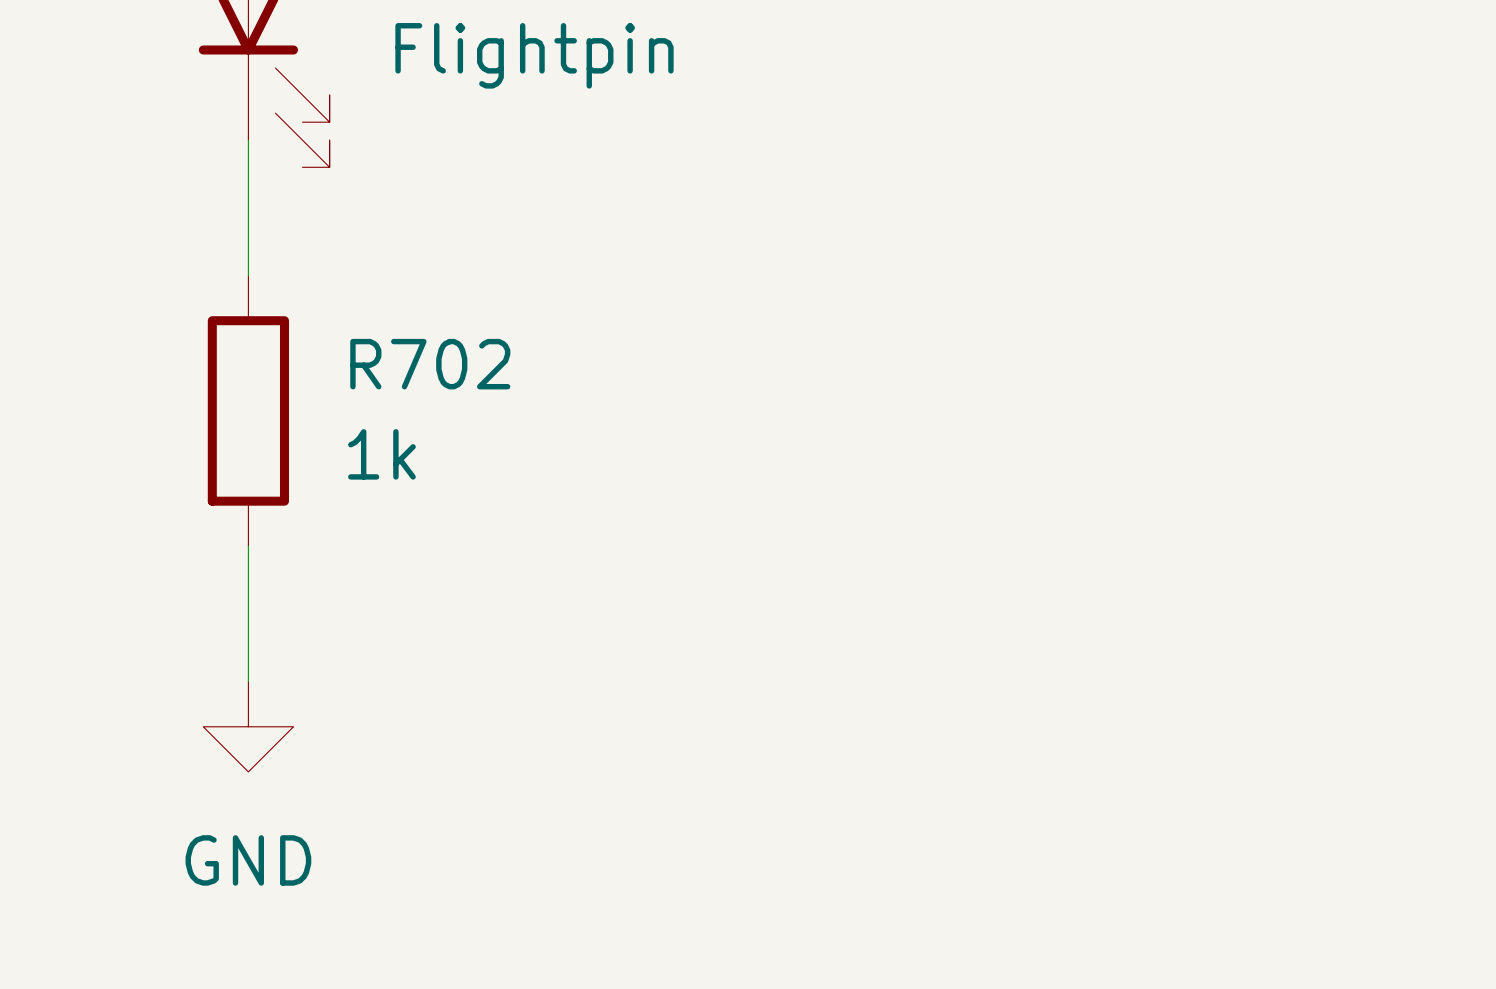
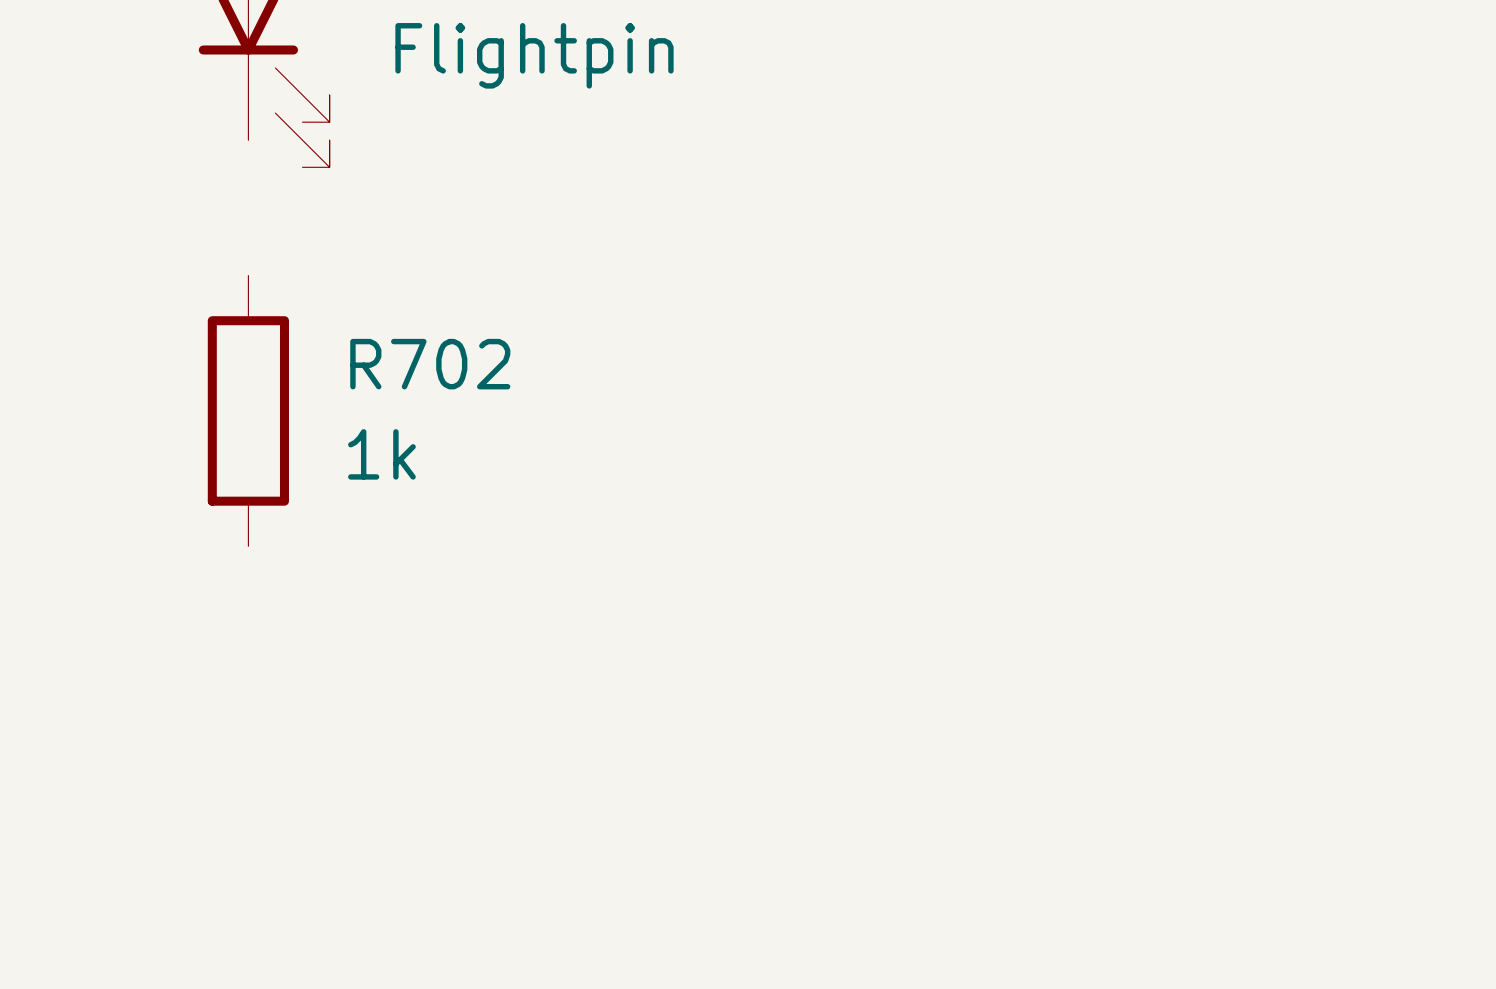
wire: (248, 140) (248, 275) -> none
wire: (248, 546) (248, 681) -> none
power symbol: GND (248, 726) -> none

